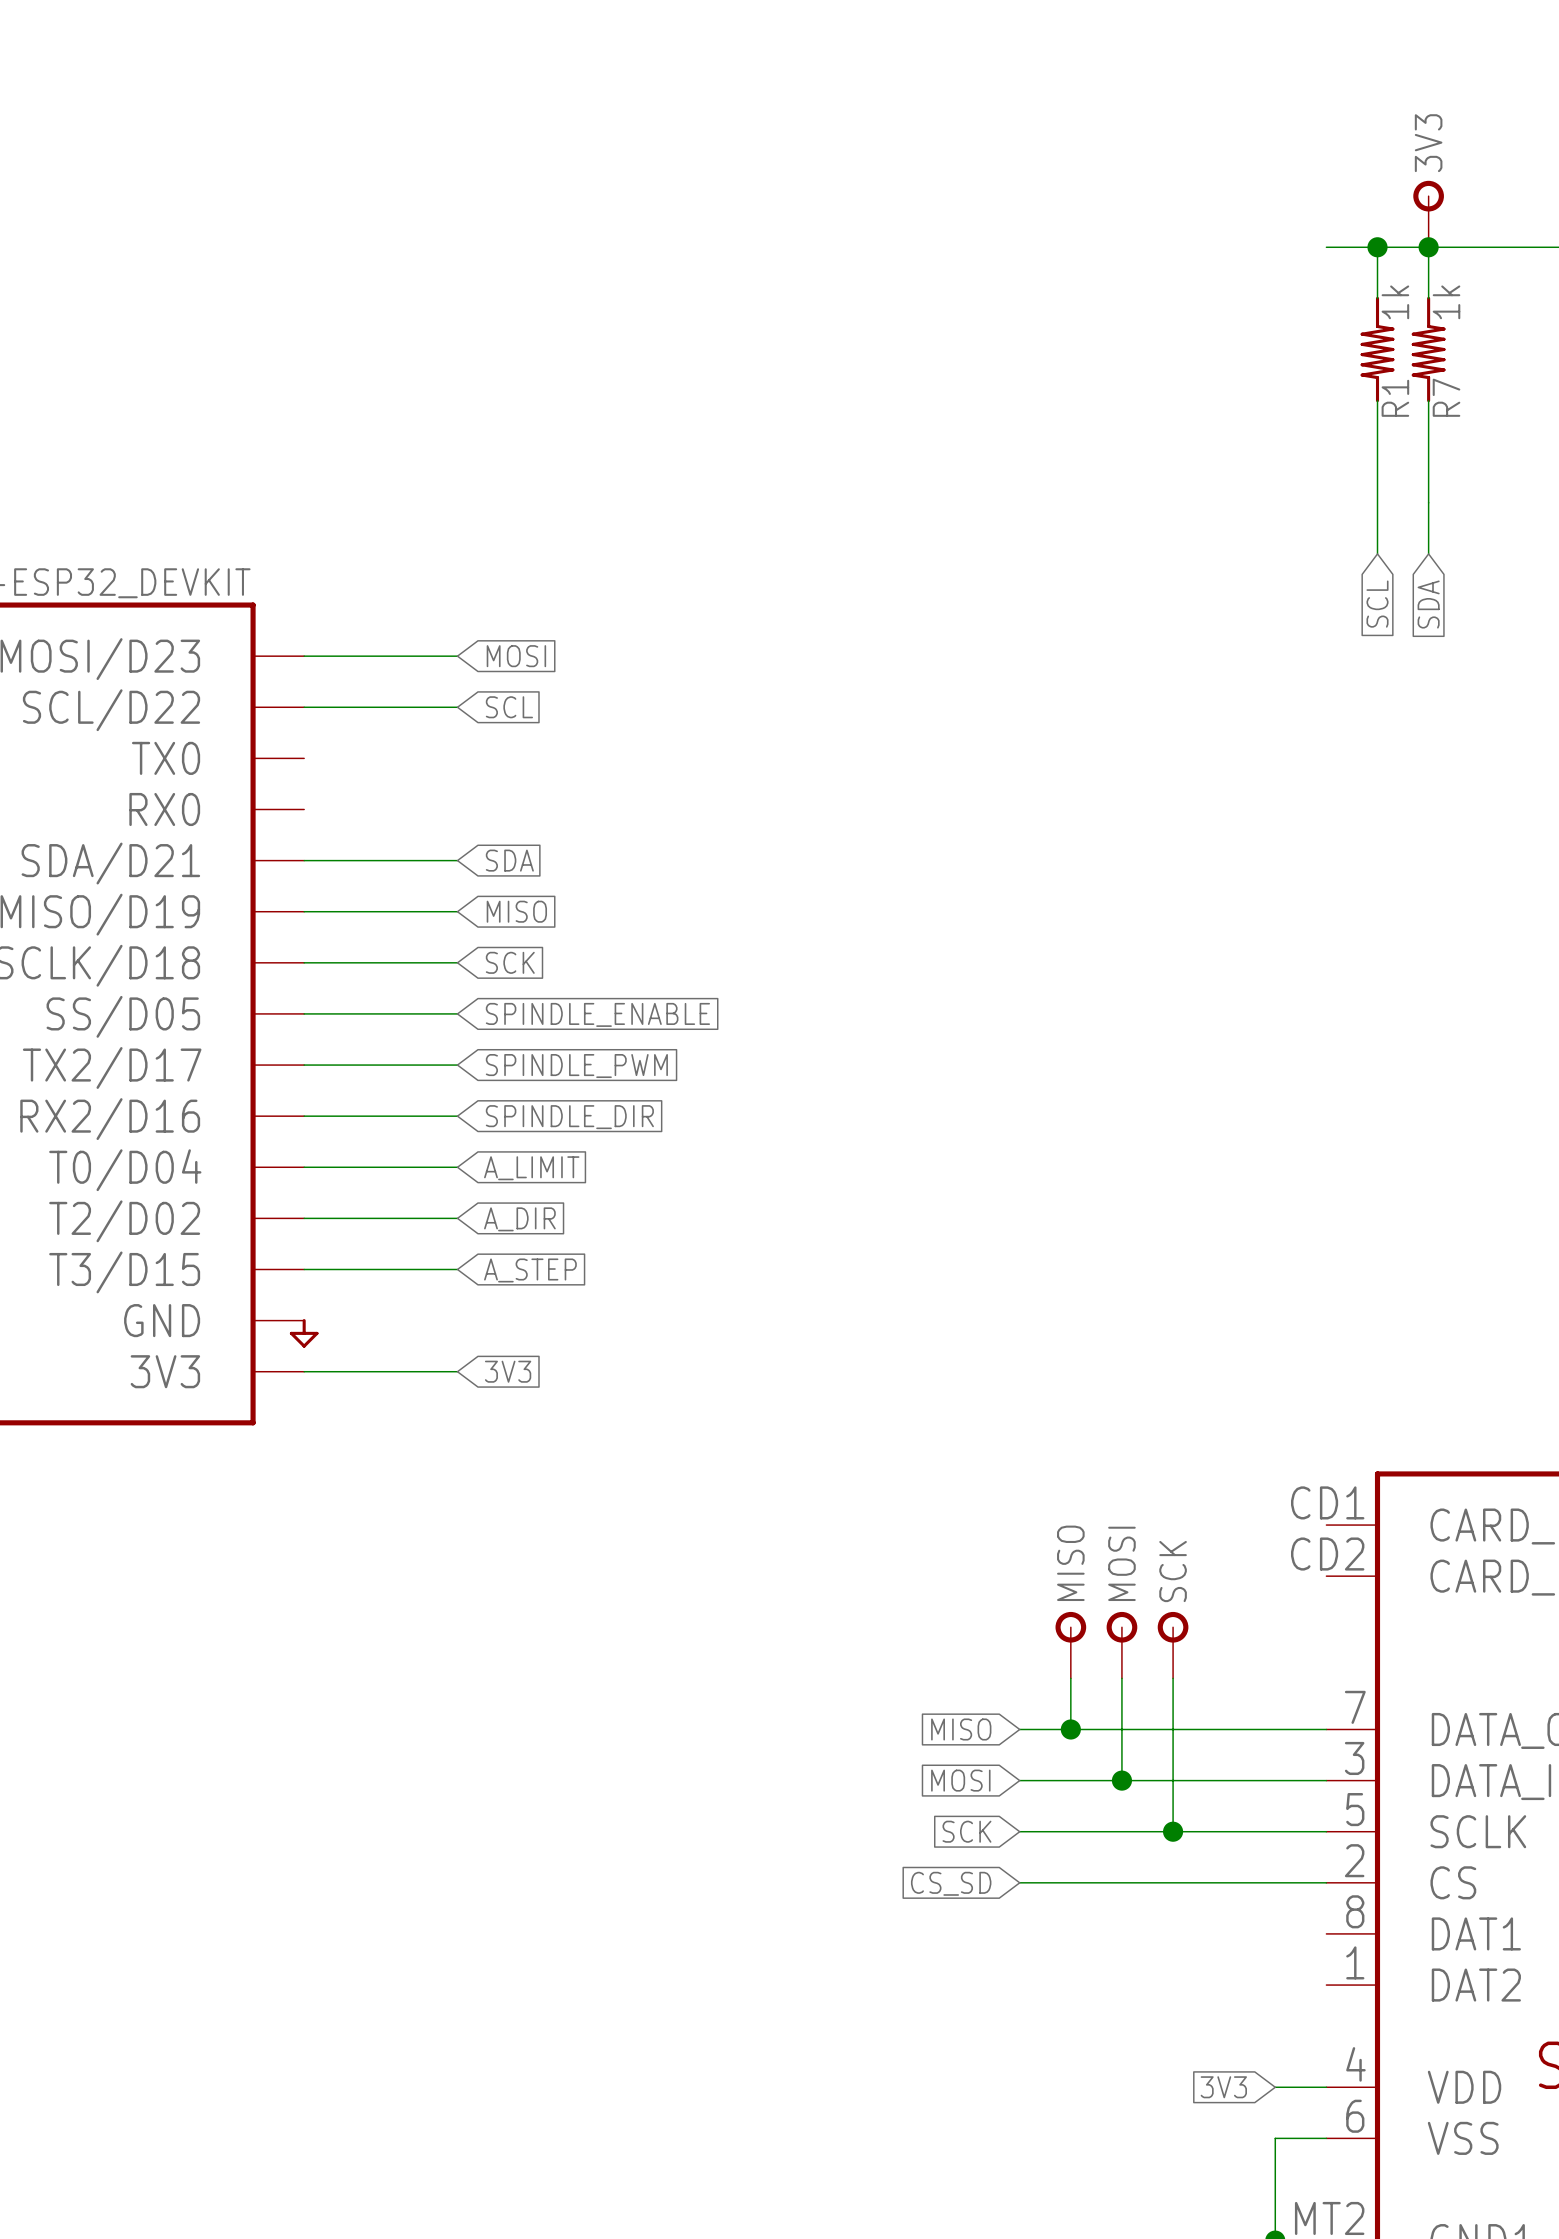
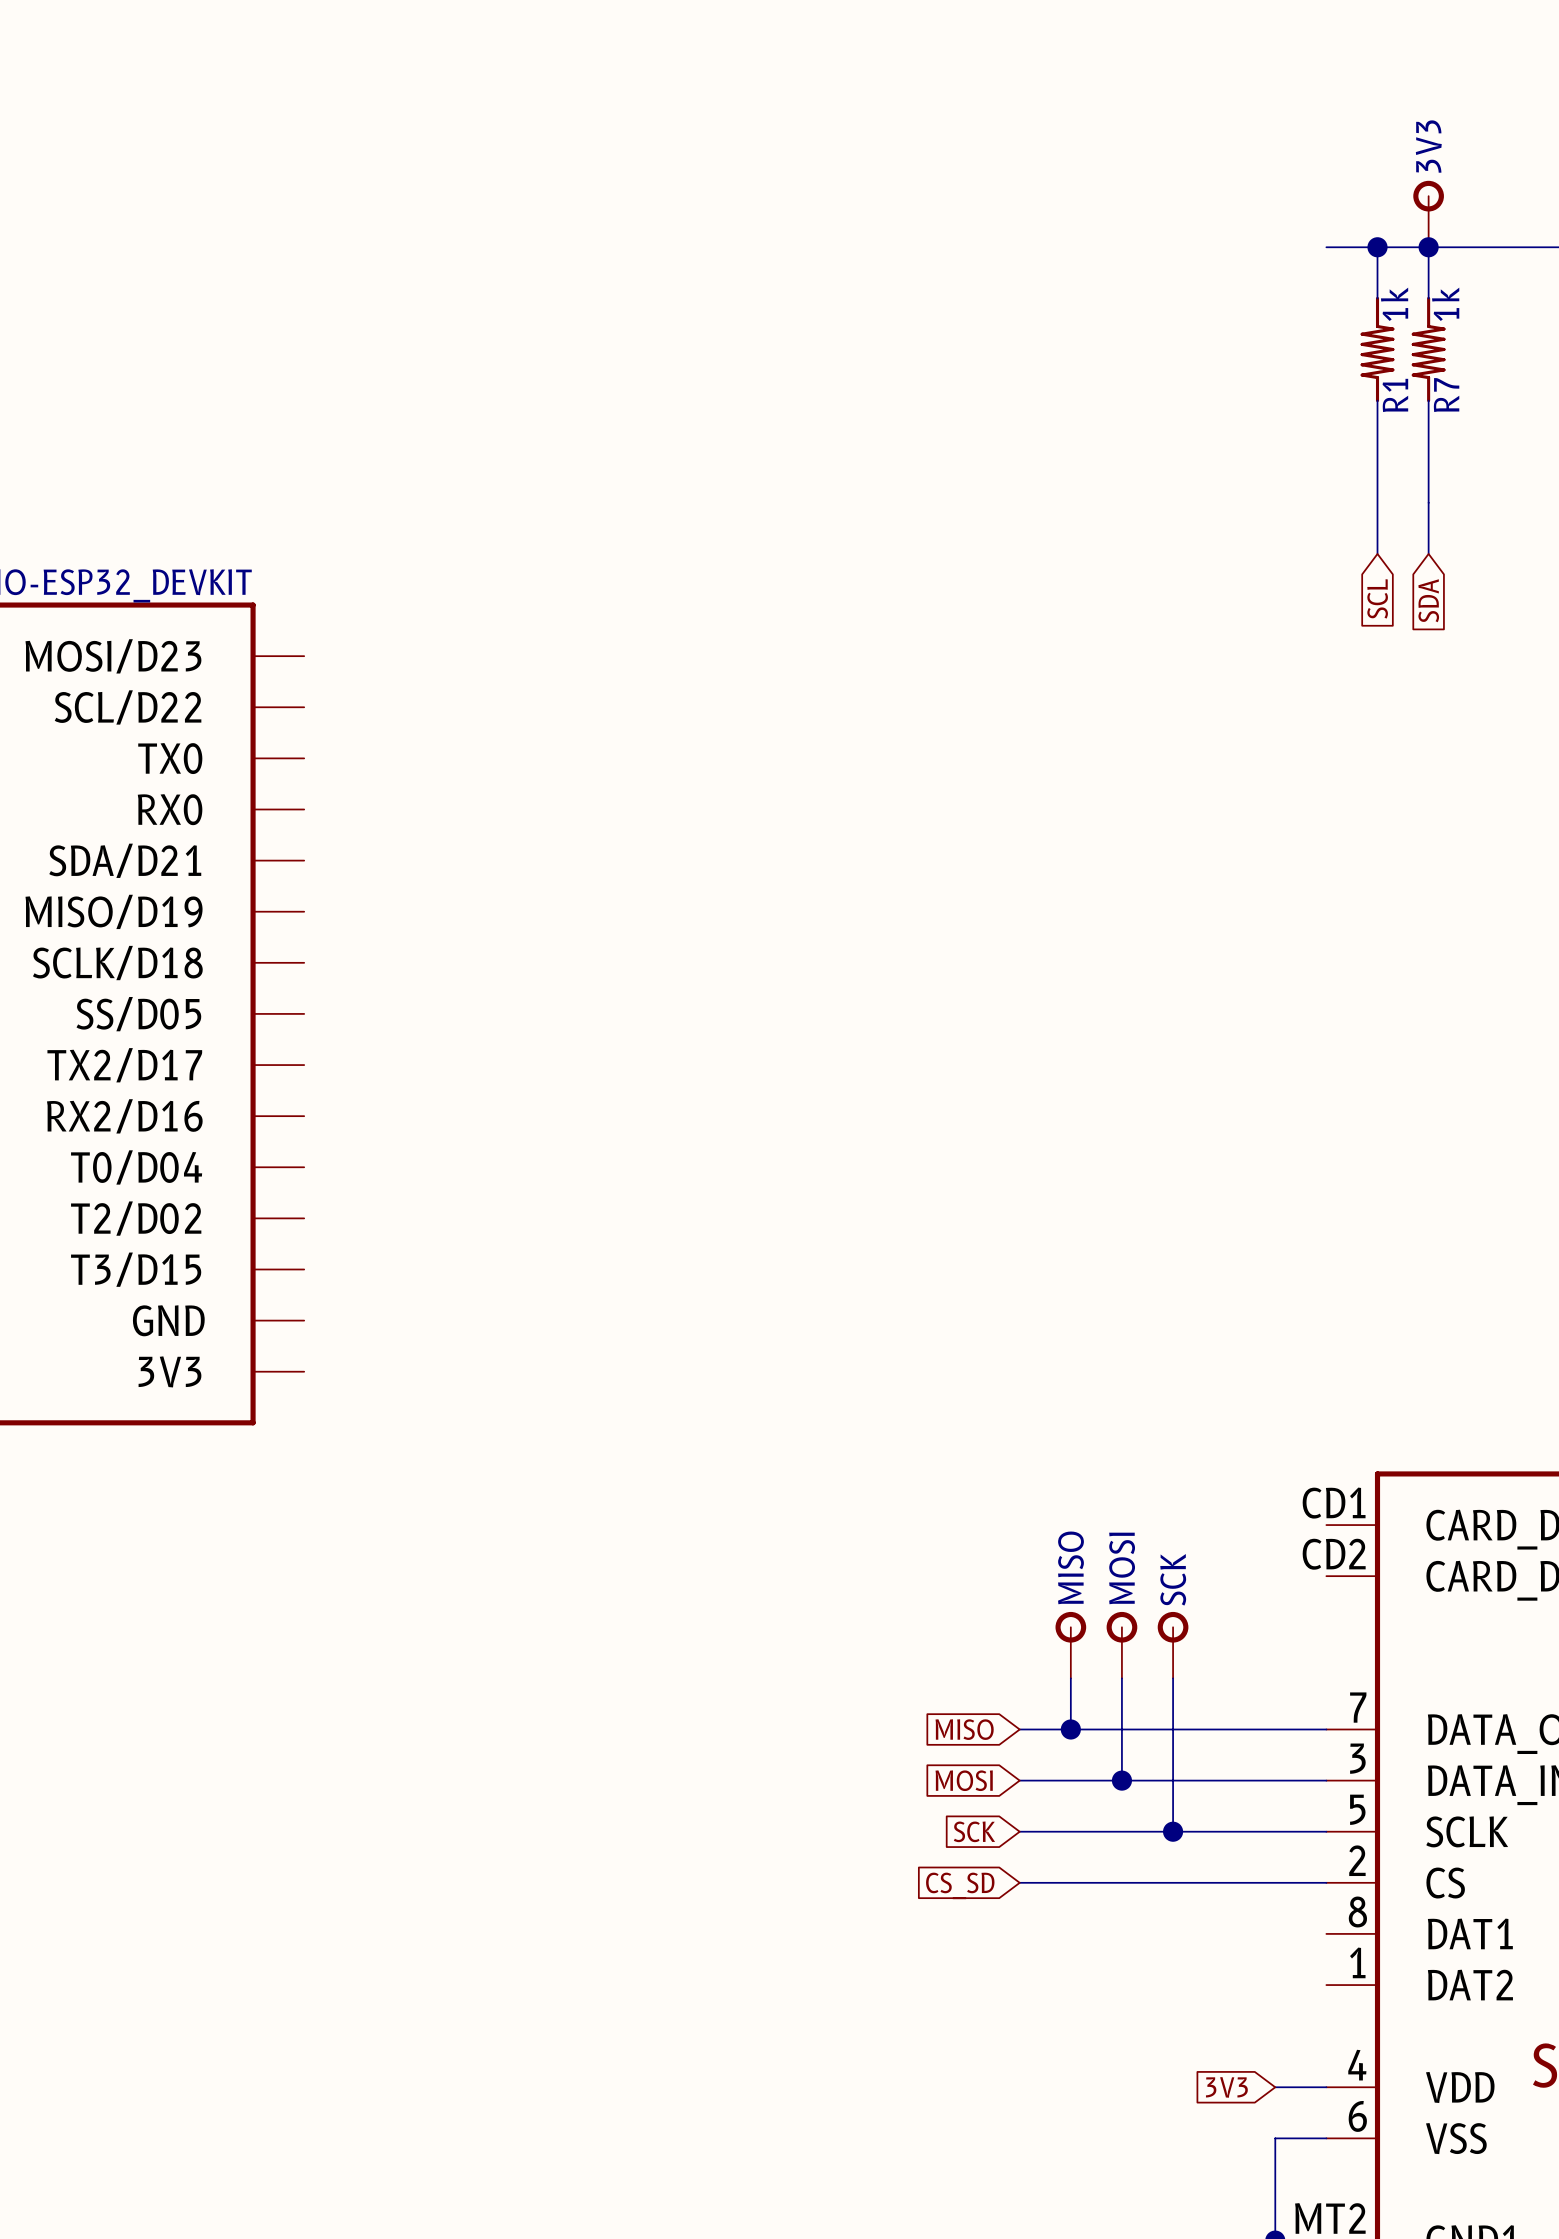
wire: (304, 656) (457, 656) -> none
global label: MOSI (516, 656) -> none
wire: (304, 707) (457, 707) -> none
global label: SCL (509, 707) -> none
wire: (304, 860) (457, 860) -> none
global label: SDA (509, 860) -> none
wire: (304, 911) (457, 911) -> none
global label: MISO (516, 911) -> none
wire: (304, 962) (457, 962) -> none
global label: SCK (510, 962) -> none
wire: (304, 1013) (457, 1013) -> none
global label: SPINDLE_ENABLE (597, 1014) -> none
wire: (304, 1065) (457, 1065) -> none
global label: SPINDLE_PWM (576, 1066) -> none
wire: (304, 1116) (457, 1116) -> none
global label: SPINDLE_DIR (569, 1117) -> none
wire: (304, 1167) (457, 1167) -> none
global label: A_LIMIT (531, 1168) -> none
wire: (304, 1218) (457, 1218) -> none
global label: A_DIR (519, 1219) -> none
wire: (304, 1269) (457, 1269) -> none
global label: A_STEP (530, 1270) -> none
power symbol: (304, 1333) -> none
wire: (304, 1371) (457, 1371) -> none
global label: 3V3 (508, 1371) -> none

